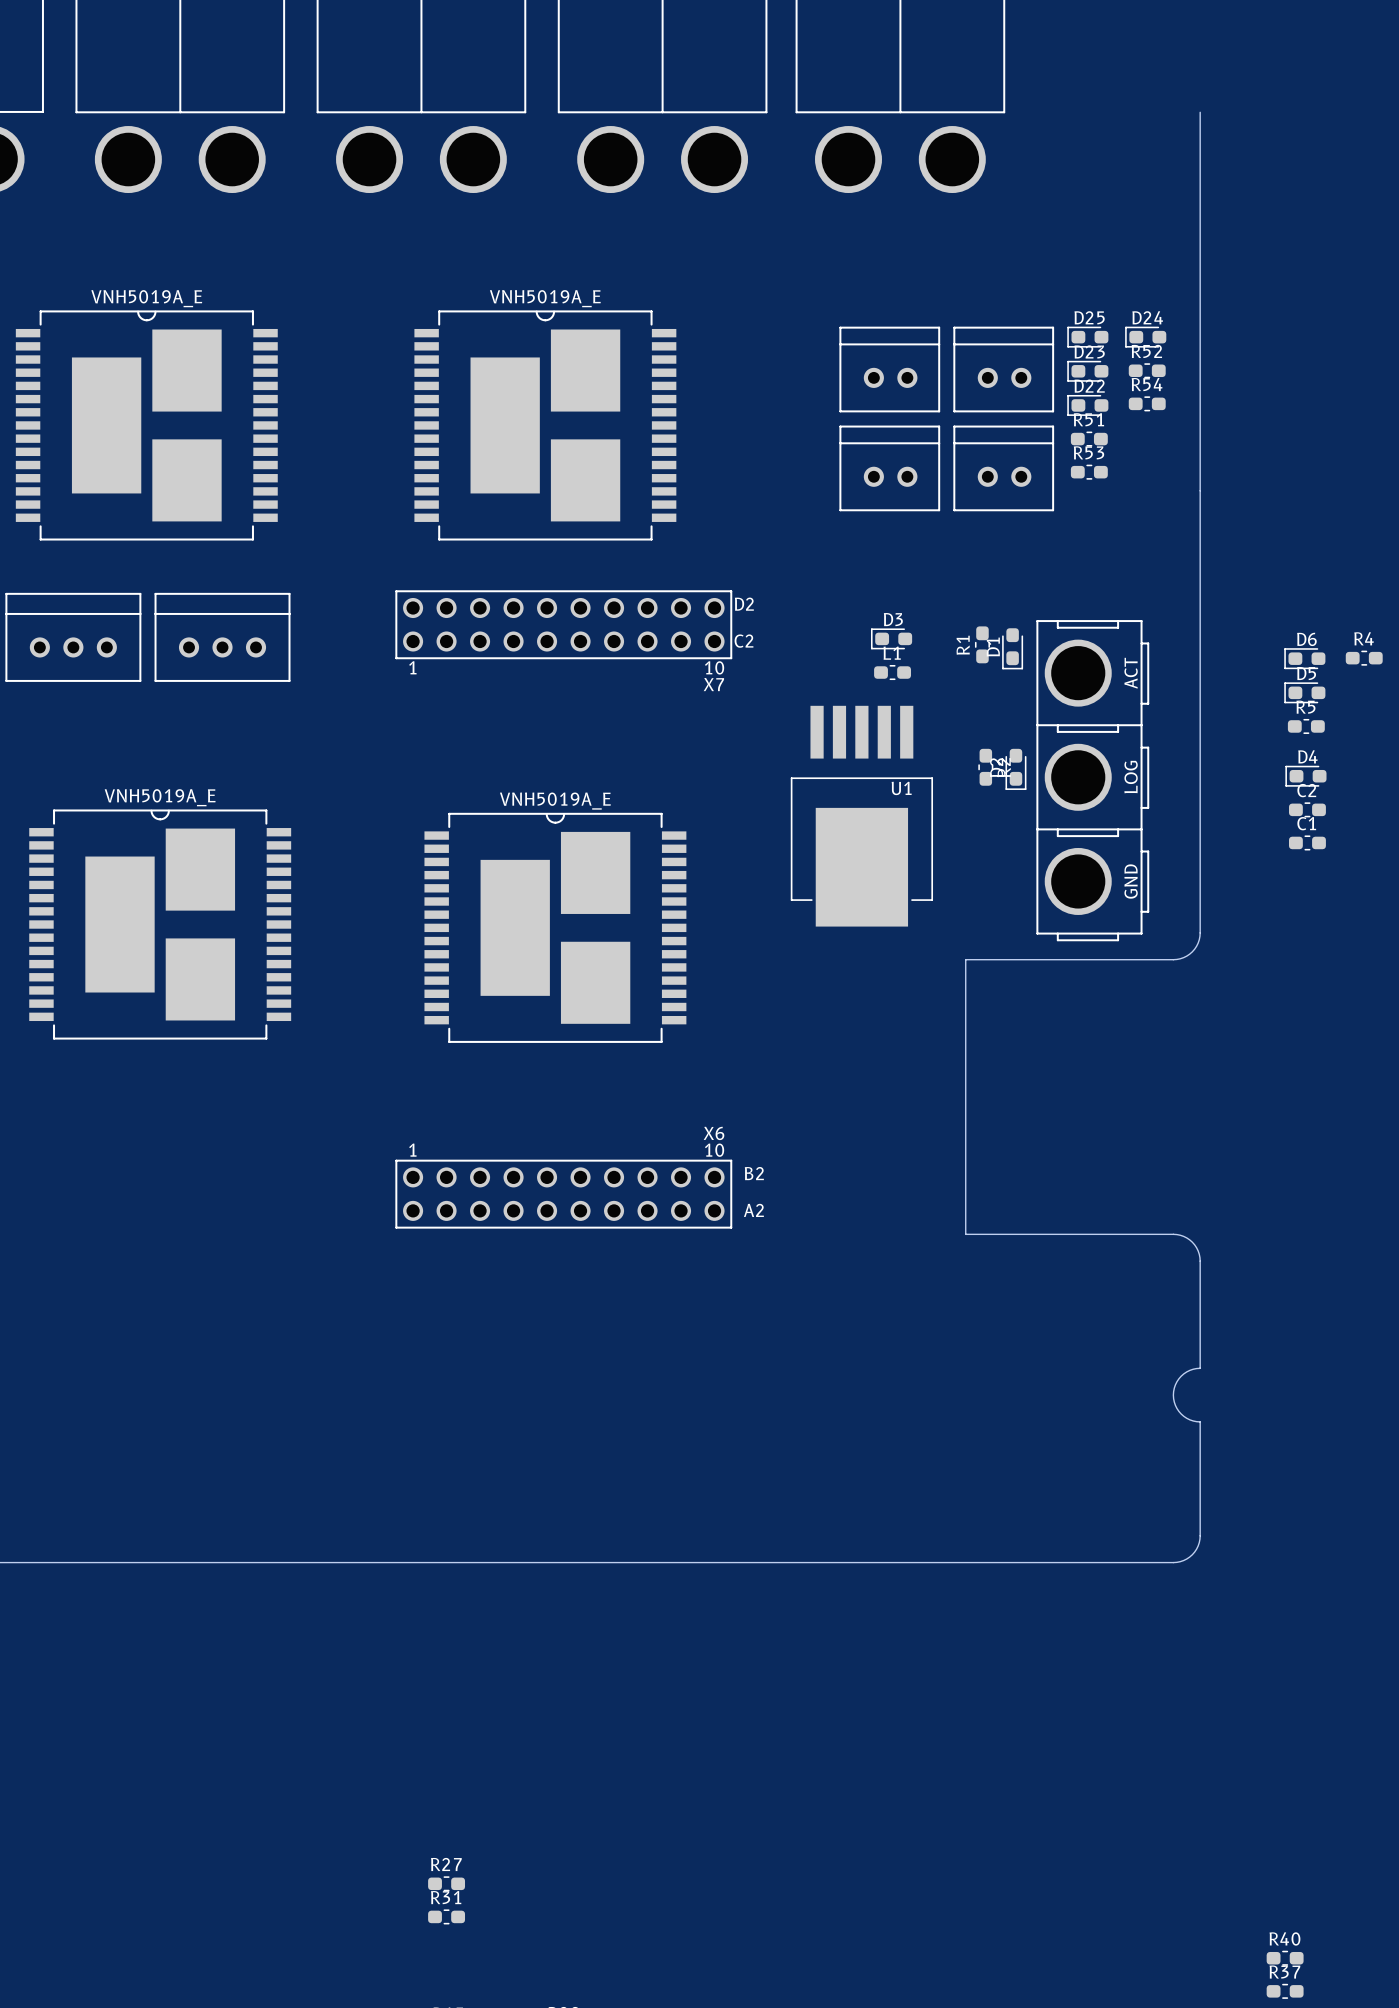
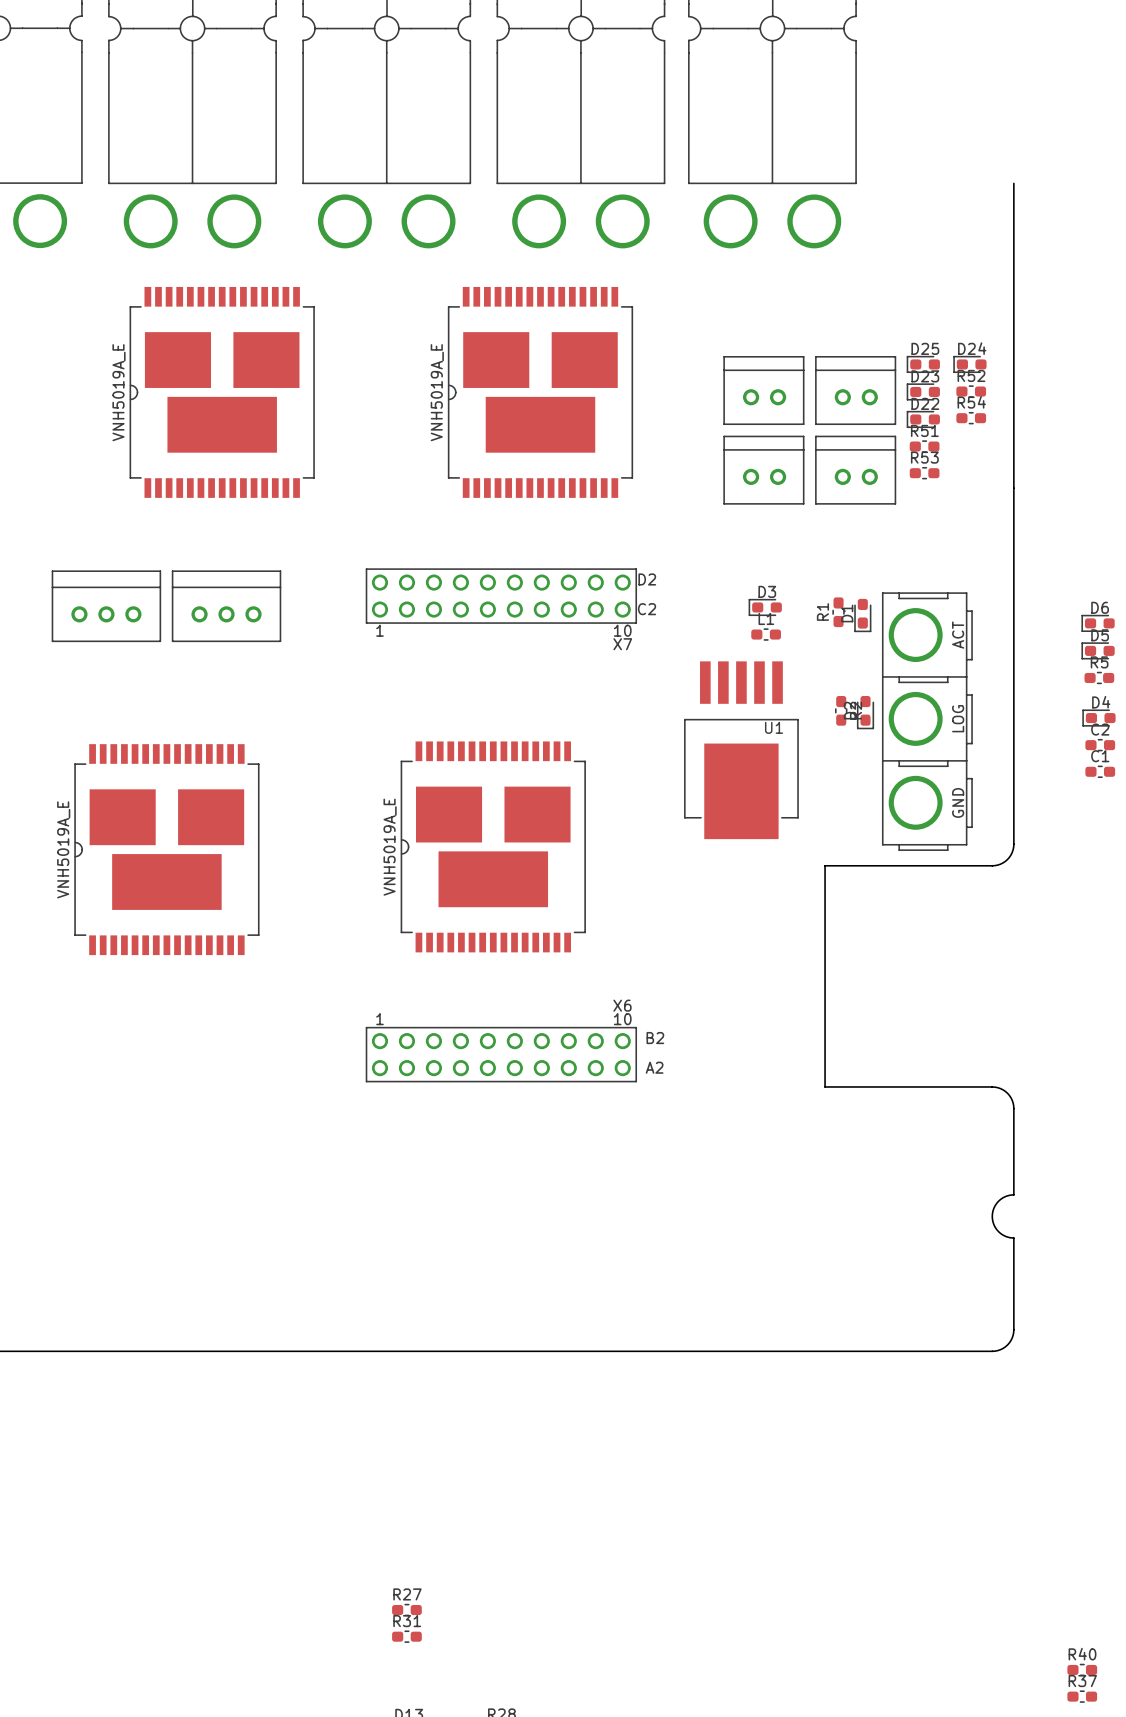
part rotation: 0° (146, 425) -> 90° counterclockwise (222, 392)
part rotation: 0° (545, 425) -> 90° counterclockwise (540, 392)
part rotation: 0° (160, 924) -> 90° counterclockwise (166, 849)
part rotation: 0° (555, 927) -> 90° counterclockwise (493, 846)

